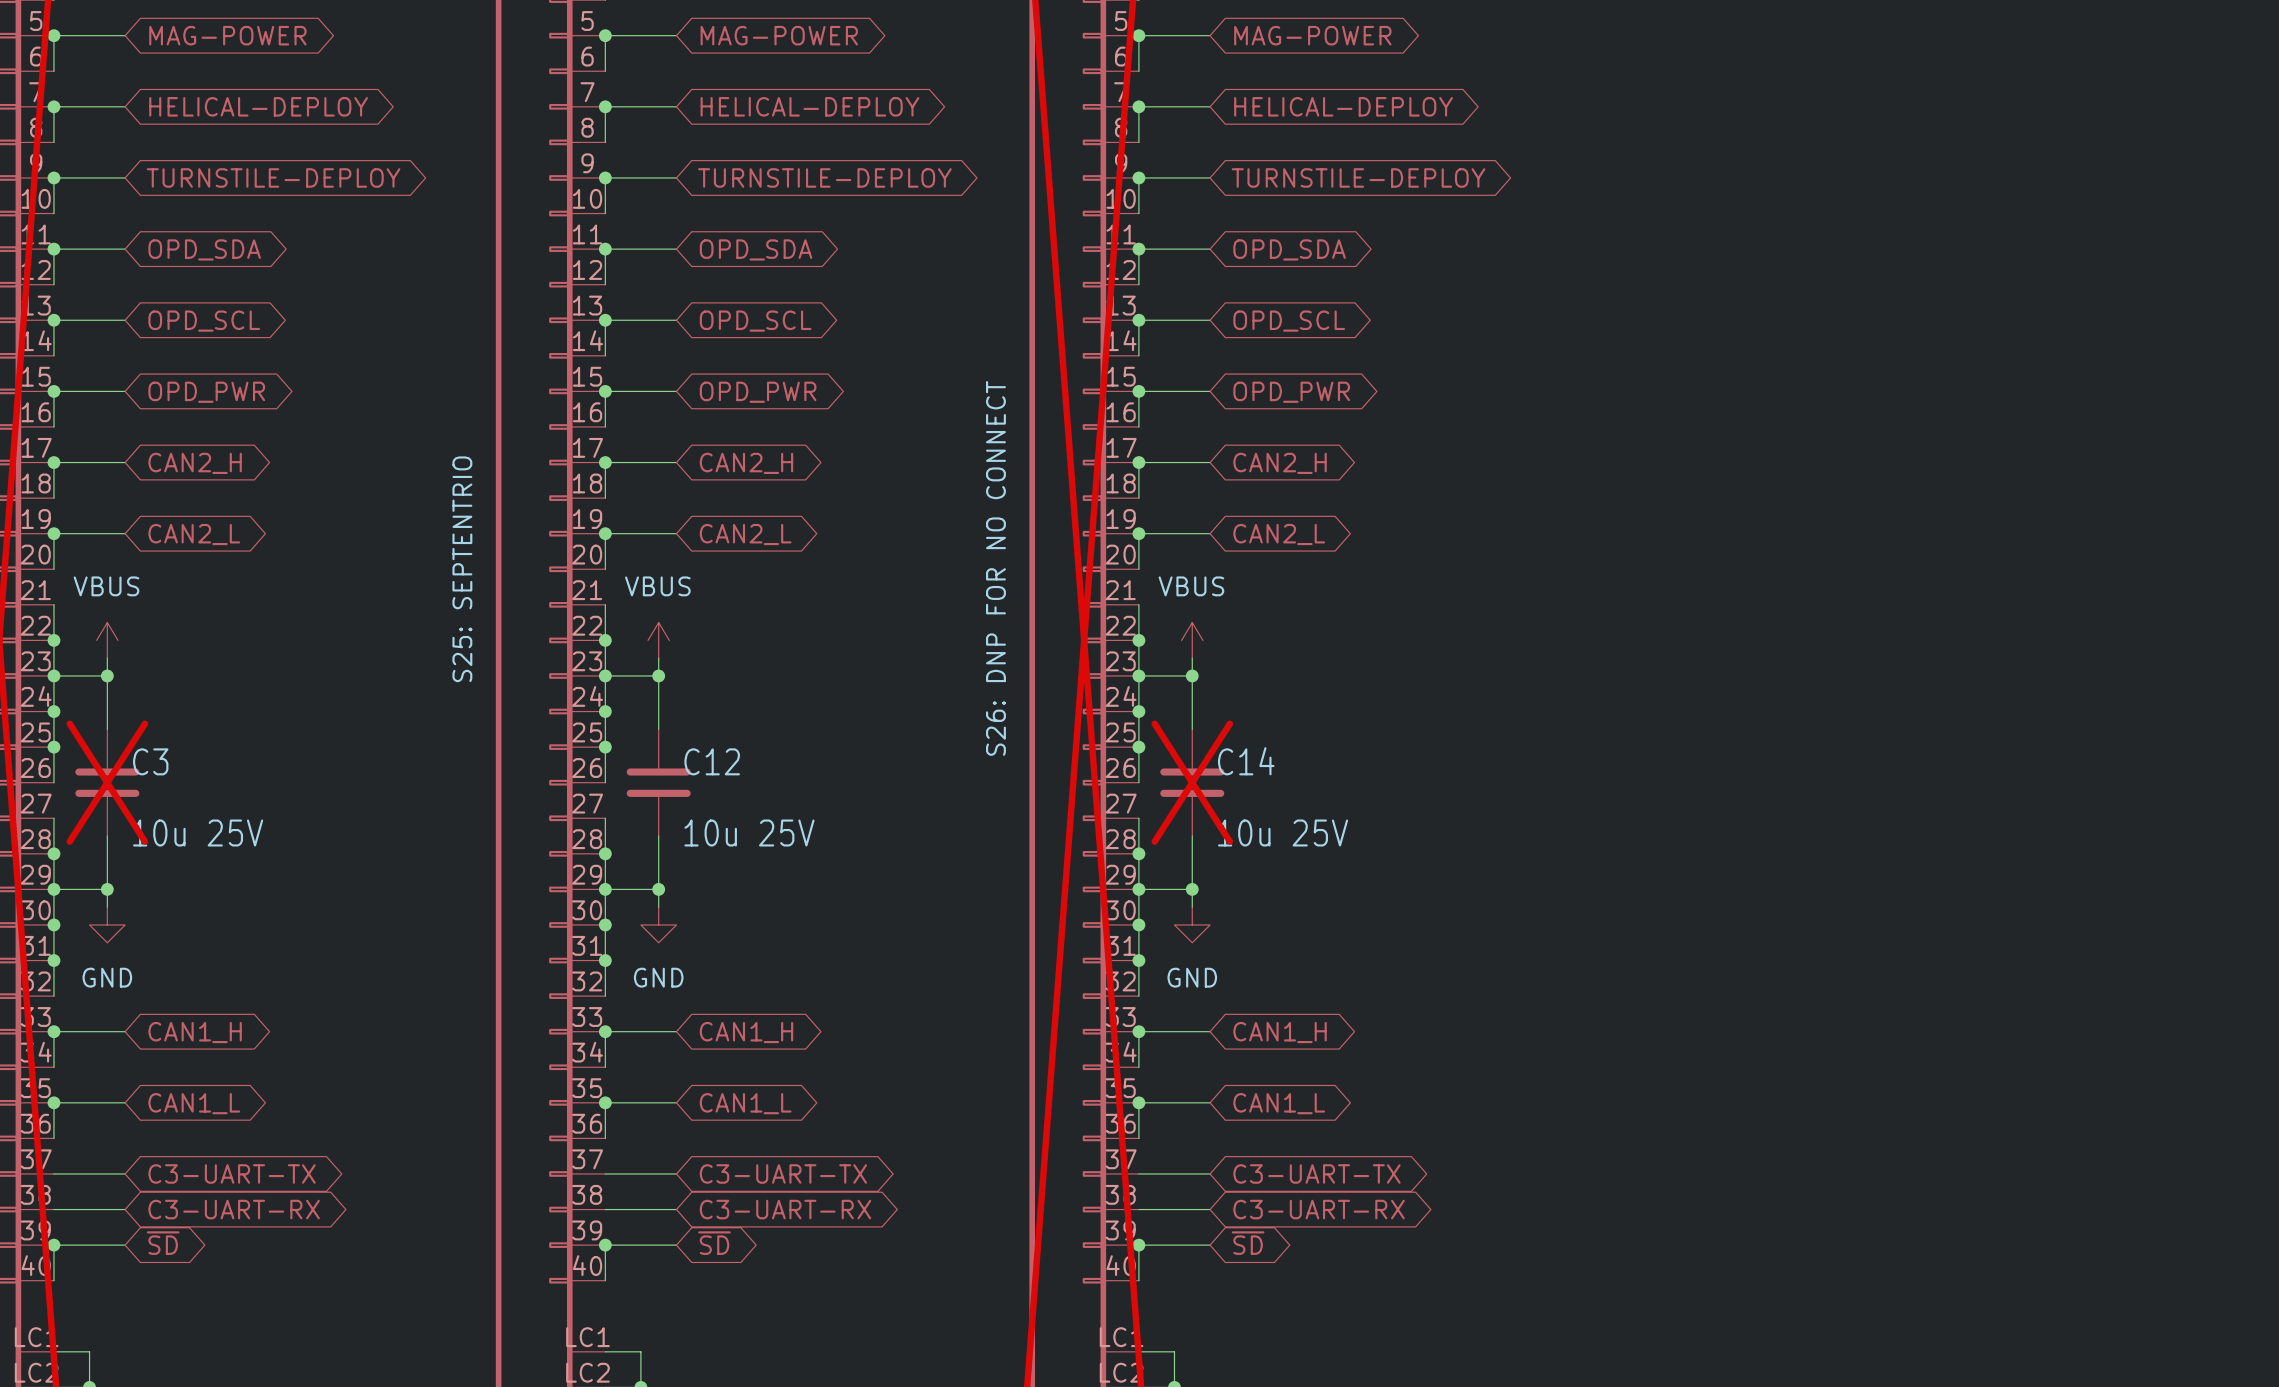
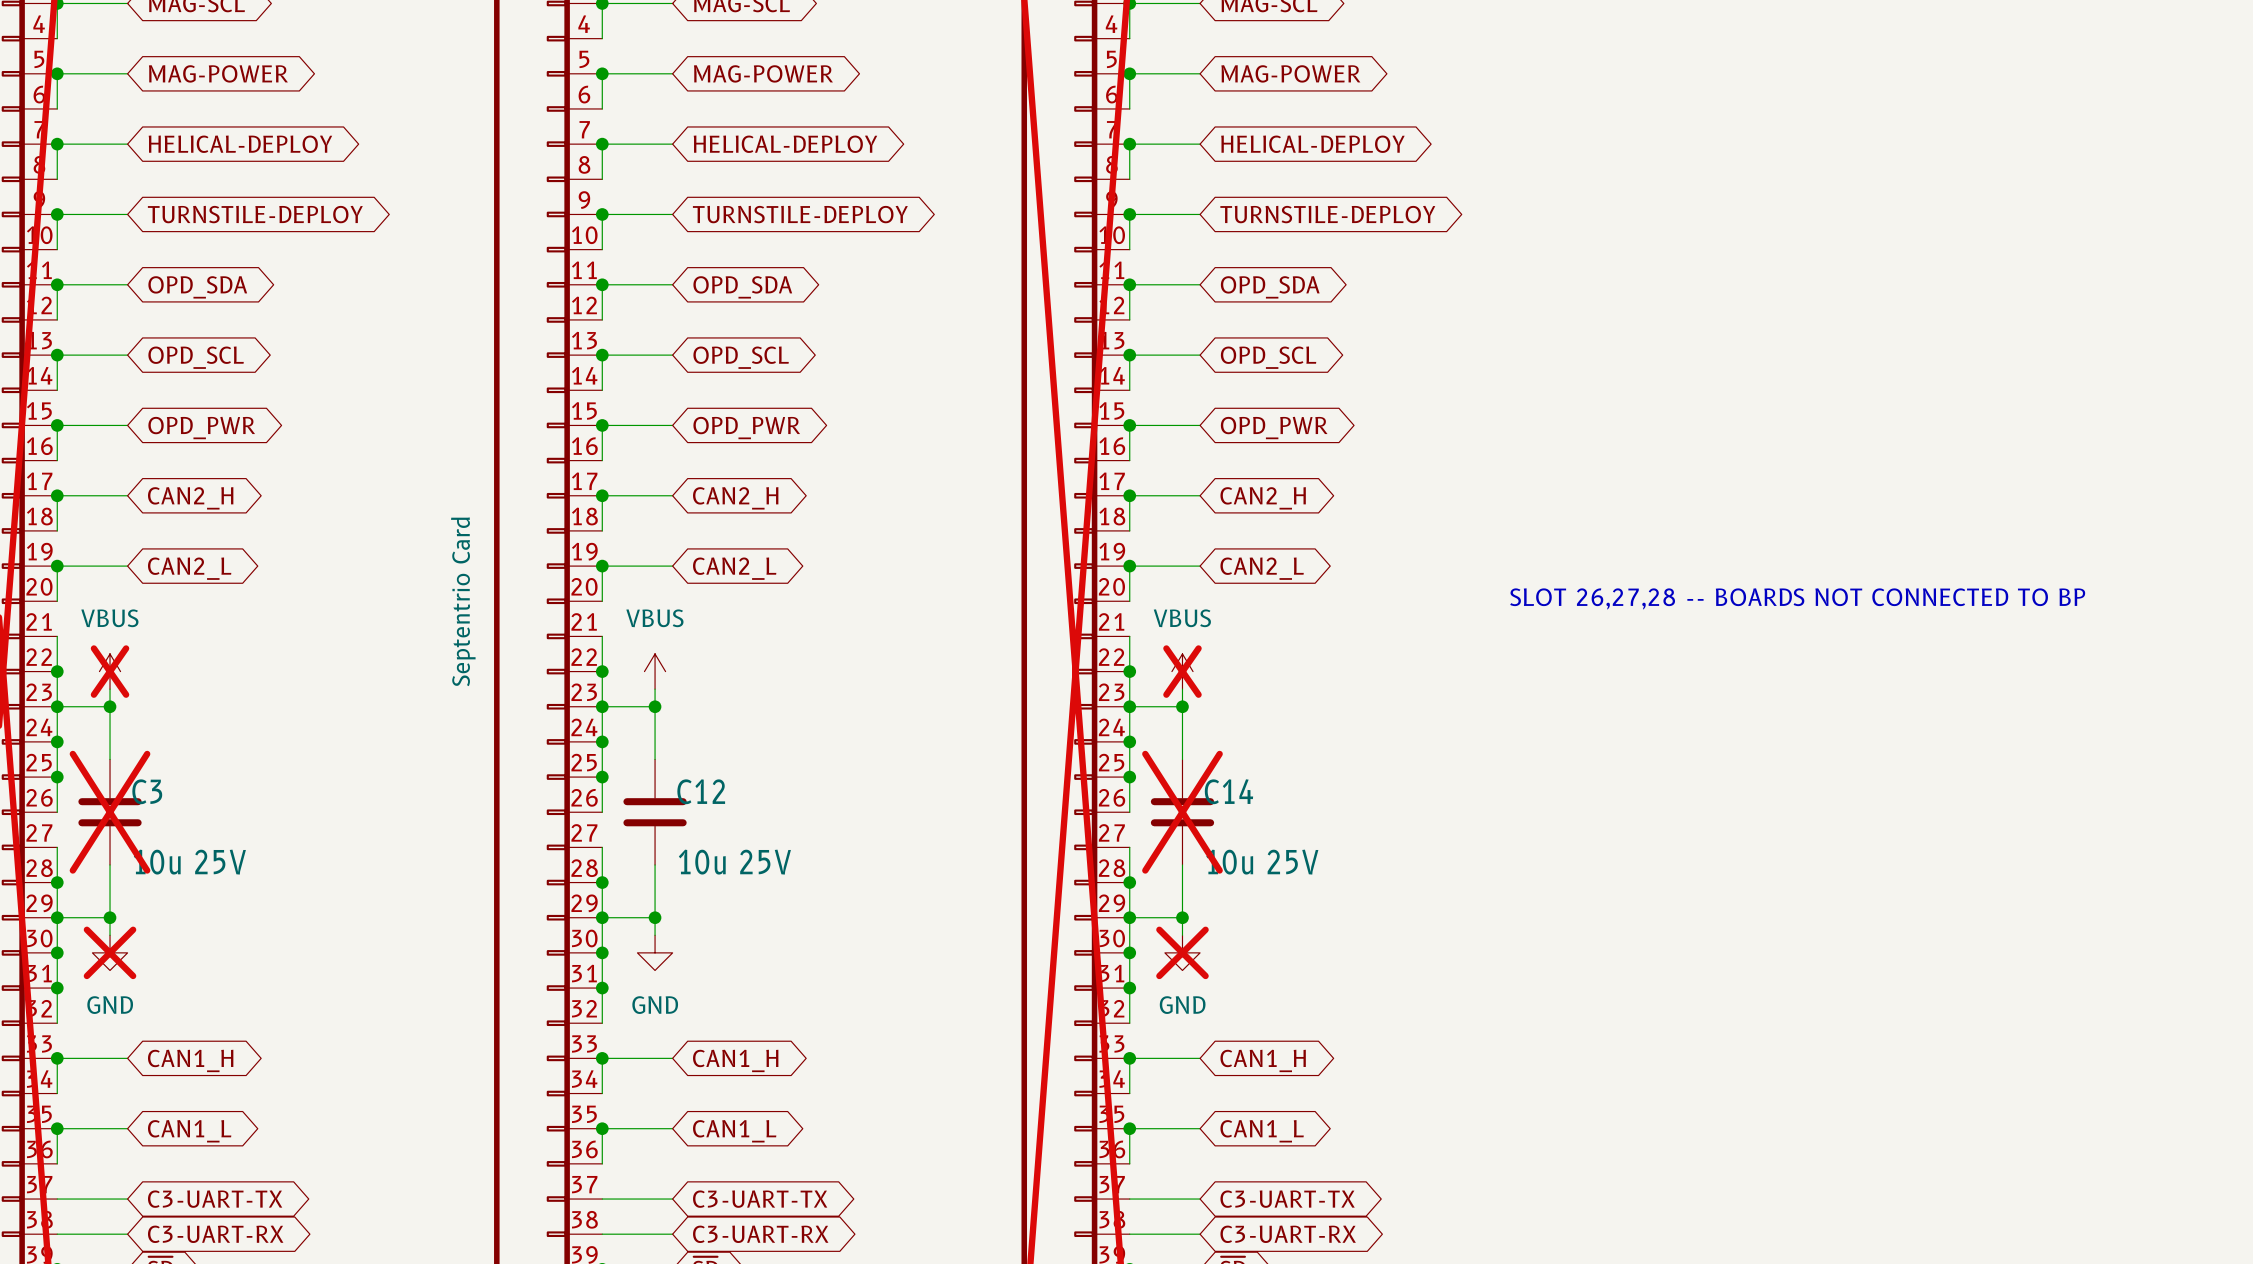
text: none -> SLOT 26,27,28 -- BOARDS NOT CONNECTED TO BP (1797, 598)
part text: S26: DNP FOR NO CONNECT (995, 568) -> none
part text: S25: SEPTENTRIO (462, 569) -> Septentrio Card (463, 601)
power symbol do-not-place cross: none -> (110, 671)
power symbol do-not-place cross: none -> (1182, 671)
power symbol do-not-place cross: none -> (110, 952)
power symbol do-not-place cross: none -> (1182, 952)

